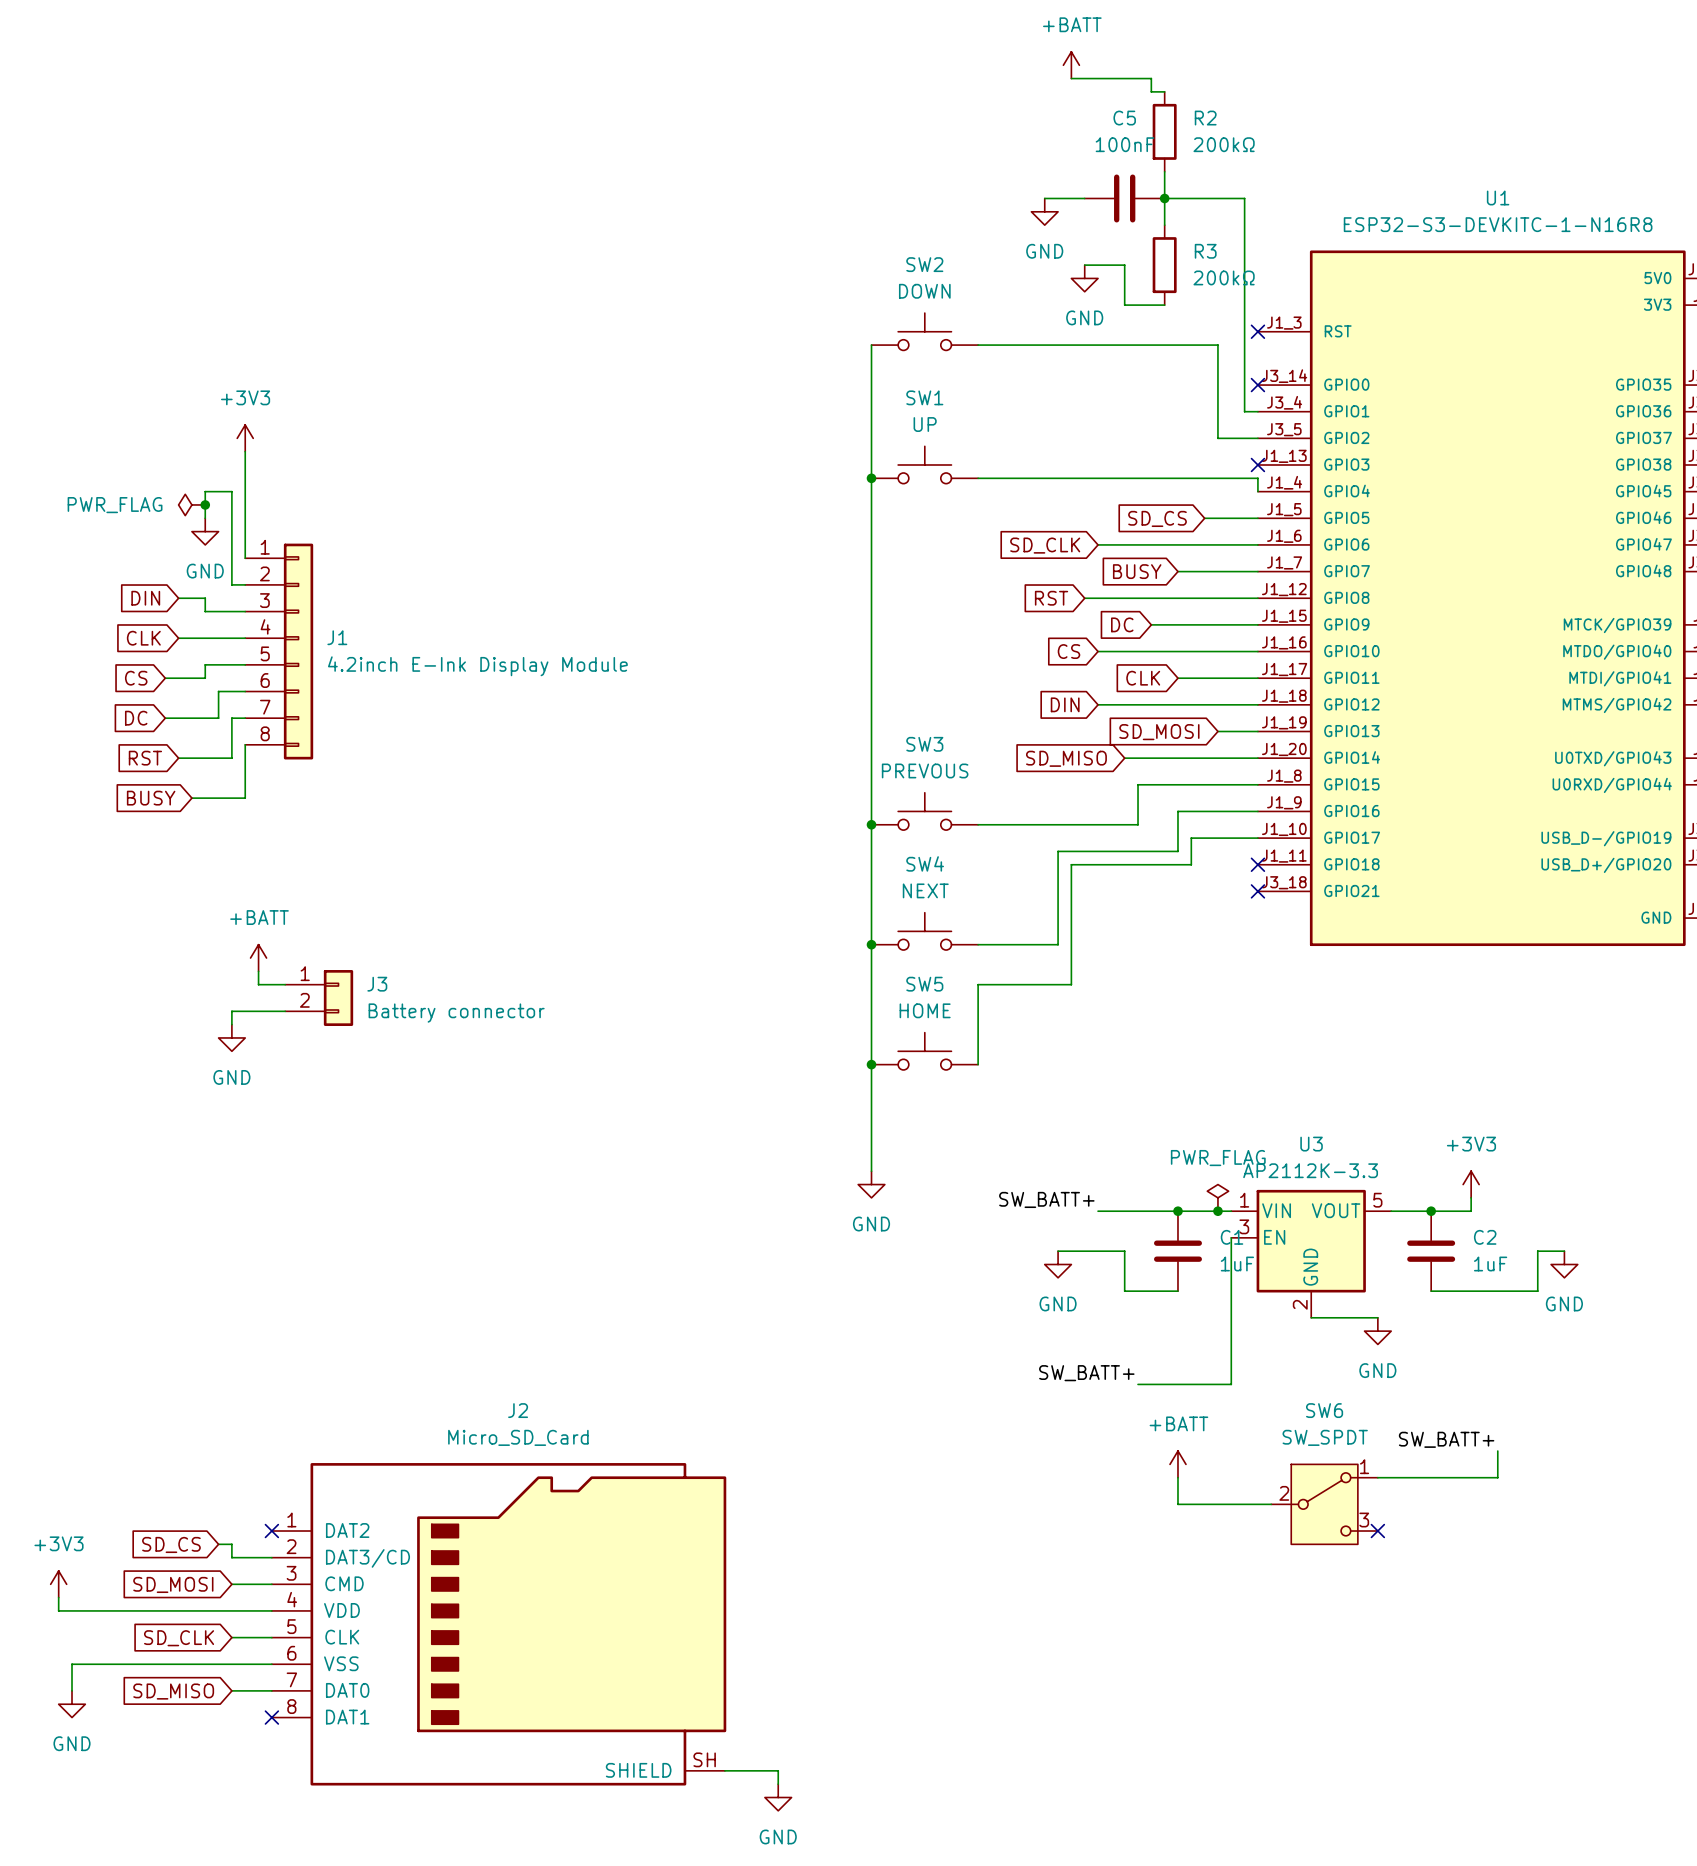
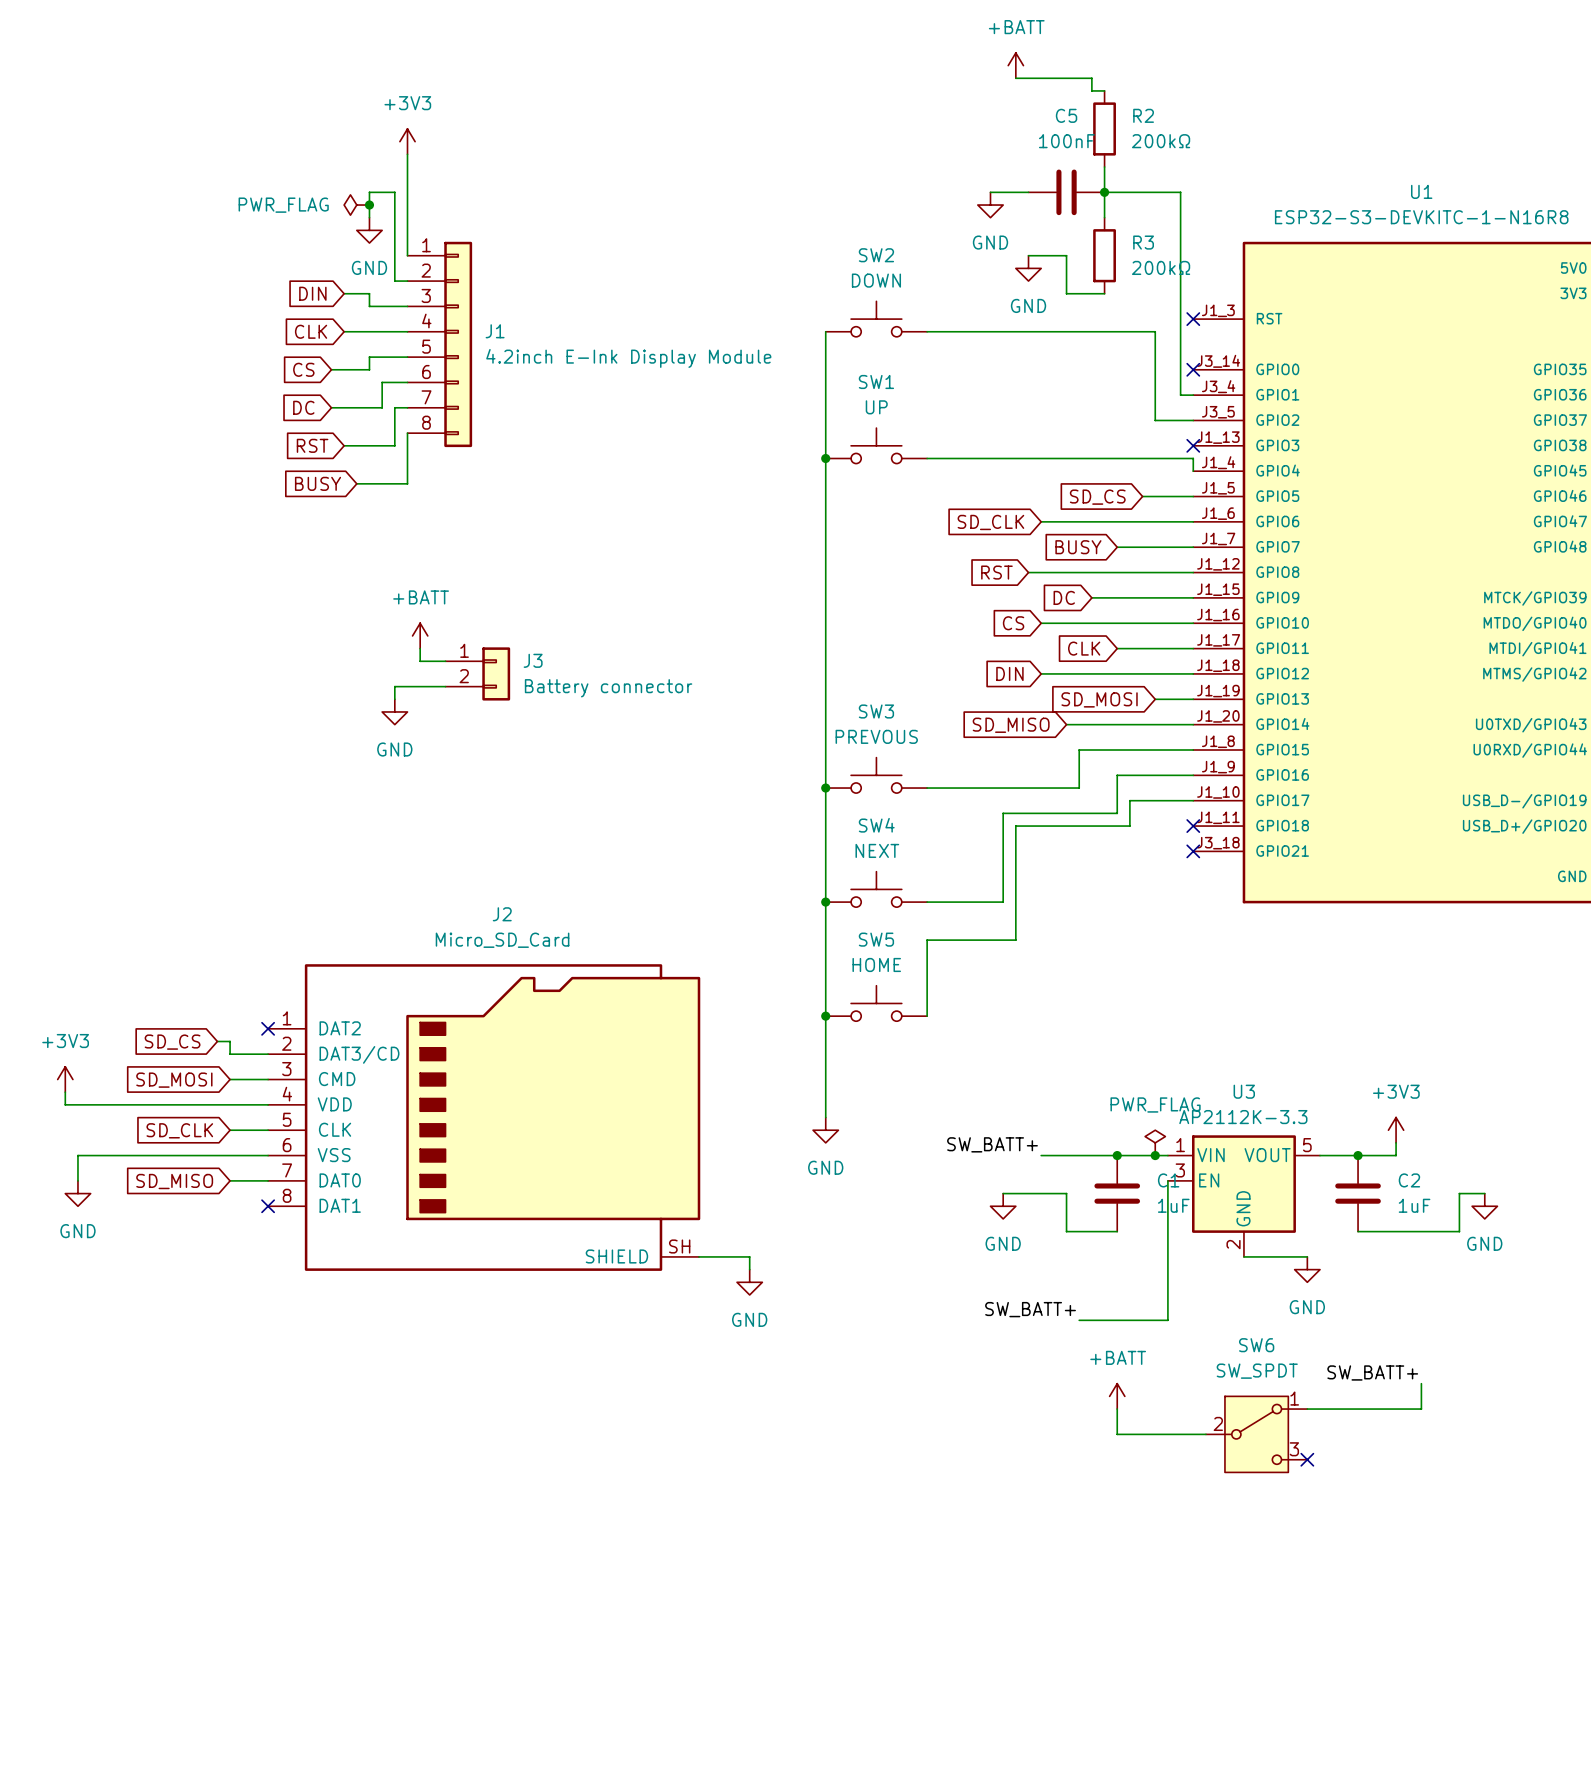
power symbol: none -> +3V3 (407, 141)
wire: none -> (407, 154) (407, 255)
power symbol: none -> PWR_FLAG (356, 205)
junction: none -> (369, 205)
wire: none -> (369, 217) (369, 192) (394, 192) (394, 281) (407, 281)
power symbol: none -> GND (369, 230)
global label: none -> DIN (312, 293)
wire: none -> (344, 293) (369, 293) (369, 306) (407, 306)
global label: none -> CLK (311, 331)
wire: none -> (344, 331) (407, 331)
wire: none -> (407, 357) (369, 357) (369, 369) (331, 369)
global label: none -> CS (303, 369)
wire: none -> (407, 382) (382, 382) (382, 407) (331, 407)
global label: none -> DC (303, 407)
wire: none -> (407, 407) (394, 407) (394, 445) (344, 445)
power symbol: +3V3 (245, 438) -> none
wire: (245, 451) (245, 558) -> none
wire: none -> (407, 433) (407, 483) (356, 483)
global label: none -> RST (312, 445)
power symbol: PWR_FLAG (191, 504) -> none
junction: (205, 504) -> none
global label: none -> BUSY (318, 483)
wire: (205, 518) (205, 491) (231, 491) (231, 584) (245, 584) -> none
power symbol: GND (205, 531) -> none
global label: DIN (145, 598) -> none
wire: (178, 598) (205, 598) (205, 611) (245, 611) -> none
global label: CLK (143, 638) -> none
wire: (178, 638) (245, 638) -> none
J1 position: (279, 651) -> (439, 344)
wire: (245, 664) (205, 664) (205, 678) (165, 678) -> none
power symbol: none -> +BATT (420, 635)
global label: CS (136, 678) -> none
wire: none -> (420, 648) (420, 661) (445, 661)
wire: (245, 691) (218, 691) (218, 718) (165, 718) -> none
global label: DC (136, 718) -> none
wire: (245, 718) (231, 718) (231, 758) (178, 758) -> none
wire: none -> (445, 686) (394, 686) (394, 699)
wire: (245, 744) (245, 798) (191, 798) -> none
power symbol: none -> GND (394, 711)
global label: RST (145, 758) -> none
global label: BUSY (151, 798) -> none
power symbol: +BATT (258, 958) -> none
wire: (258, 971) (258, 984) (285, 984) -> none
J3 position: (319, 998) -> (477, 673)
wire: (285, 1011) (231, 1011) (231, 1024) -> none
power symbol: GND (231, 1037) -> none
no-connect mark: none -> (268, 1028)
global label: none -> SD_CS (172, 1042)
wire: none -> (217, 1041) (230, 1041) (230, 1054) (268, 1054)
power symbol: none -> +3V3 (65, 1079)
global label: none -> SD_MOSI (174, 1080)
wire: none -> (230, 1079) (268, 1079)
wire: none -> (65, 1092) (65, 1104) (268, 1104)
wire: none -> (230, 1130) (268, 1130)
global label: none -> SD_CLK (179, 1130)
wire: none -> (268, 1155) (77, 1155) (77, 1180)
wire: none -> (230, 1180) (268, 1180)
global label: none -> SD_MISO (174, 1181)
power symbol: none -> GND (77, 1193)
no-connect mark: none -> (268, 1206)
wire: none -> (698, 1256) (749, 1256) (749, 1269)
power symbol: none -> GND (749, 1282)
no-connect mark: (271, 1531) -> none
global label: SD_CS (171, 1544) -> none
wire: (218, 1544) (231, 1544) (231, 1557) (271, 1557) -> none
power symbol: +3V3 (58, 1584) -> none
global label: SD_MOSI (173, 1584) -> none
wire: (231, 1584) (271, 1584) -> none
wire: (58, 1597) (58, 1610) (271, 1610) -> none
J2 position: (499, 1624) -> (484, 1117)
wire: (231, 1637) (271, 1637) -> none
global label: SD_CLK (179, 1638) -> none
wire: (271, 1664) (72, 1664) (72, 1690) -> none
wire: (231, 1690) (271, 1690) -> none
global label: SD_MISO (173, 1691) -> none
power symbol: GND (72, 1704) -> none
no-connect mark: (271, 1717) -> none
wire: (724, 1770) (778, 1770) (778, 1784) -> none
power symbol: GND (778, 1797) -> none

